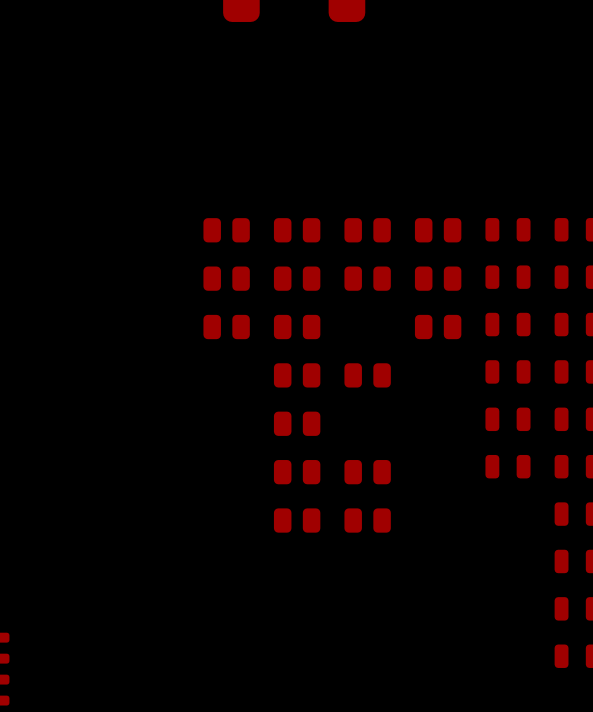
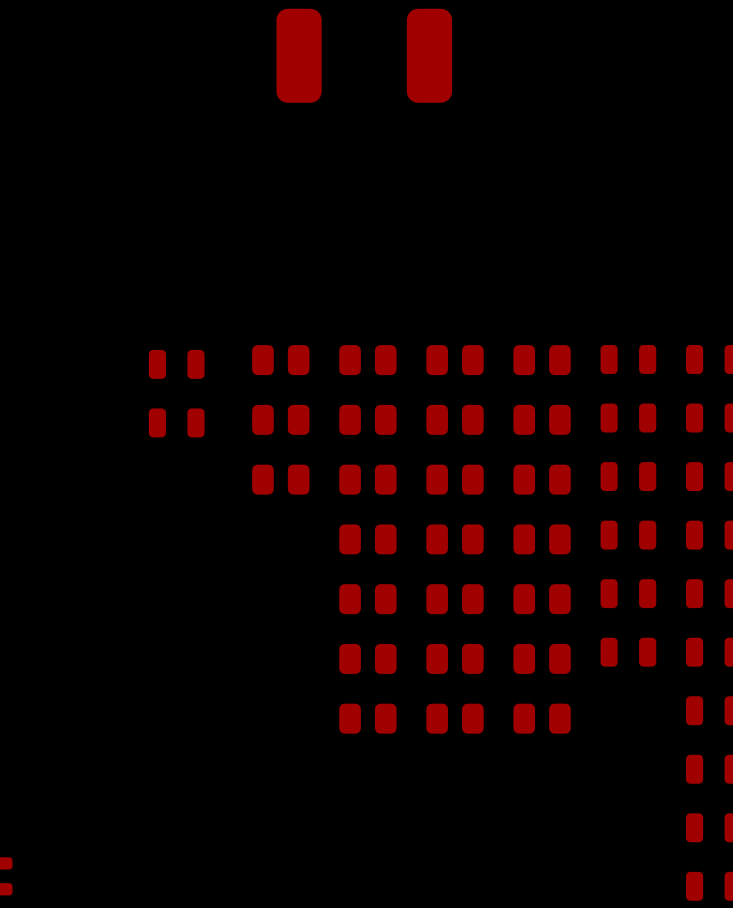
part: none -> (176, 364)
part: none -> (176, 422)
part: none -> (455, 479)
part: none -> (542, 539)
part: none -> (455, 599)
part: none -> (542, 599)
part: none -> (542, 658)
part: none -> (542, 718)

